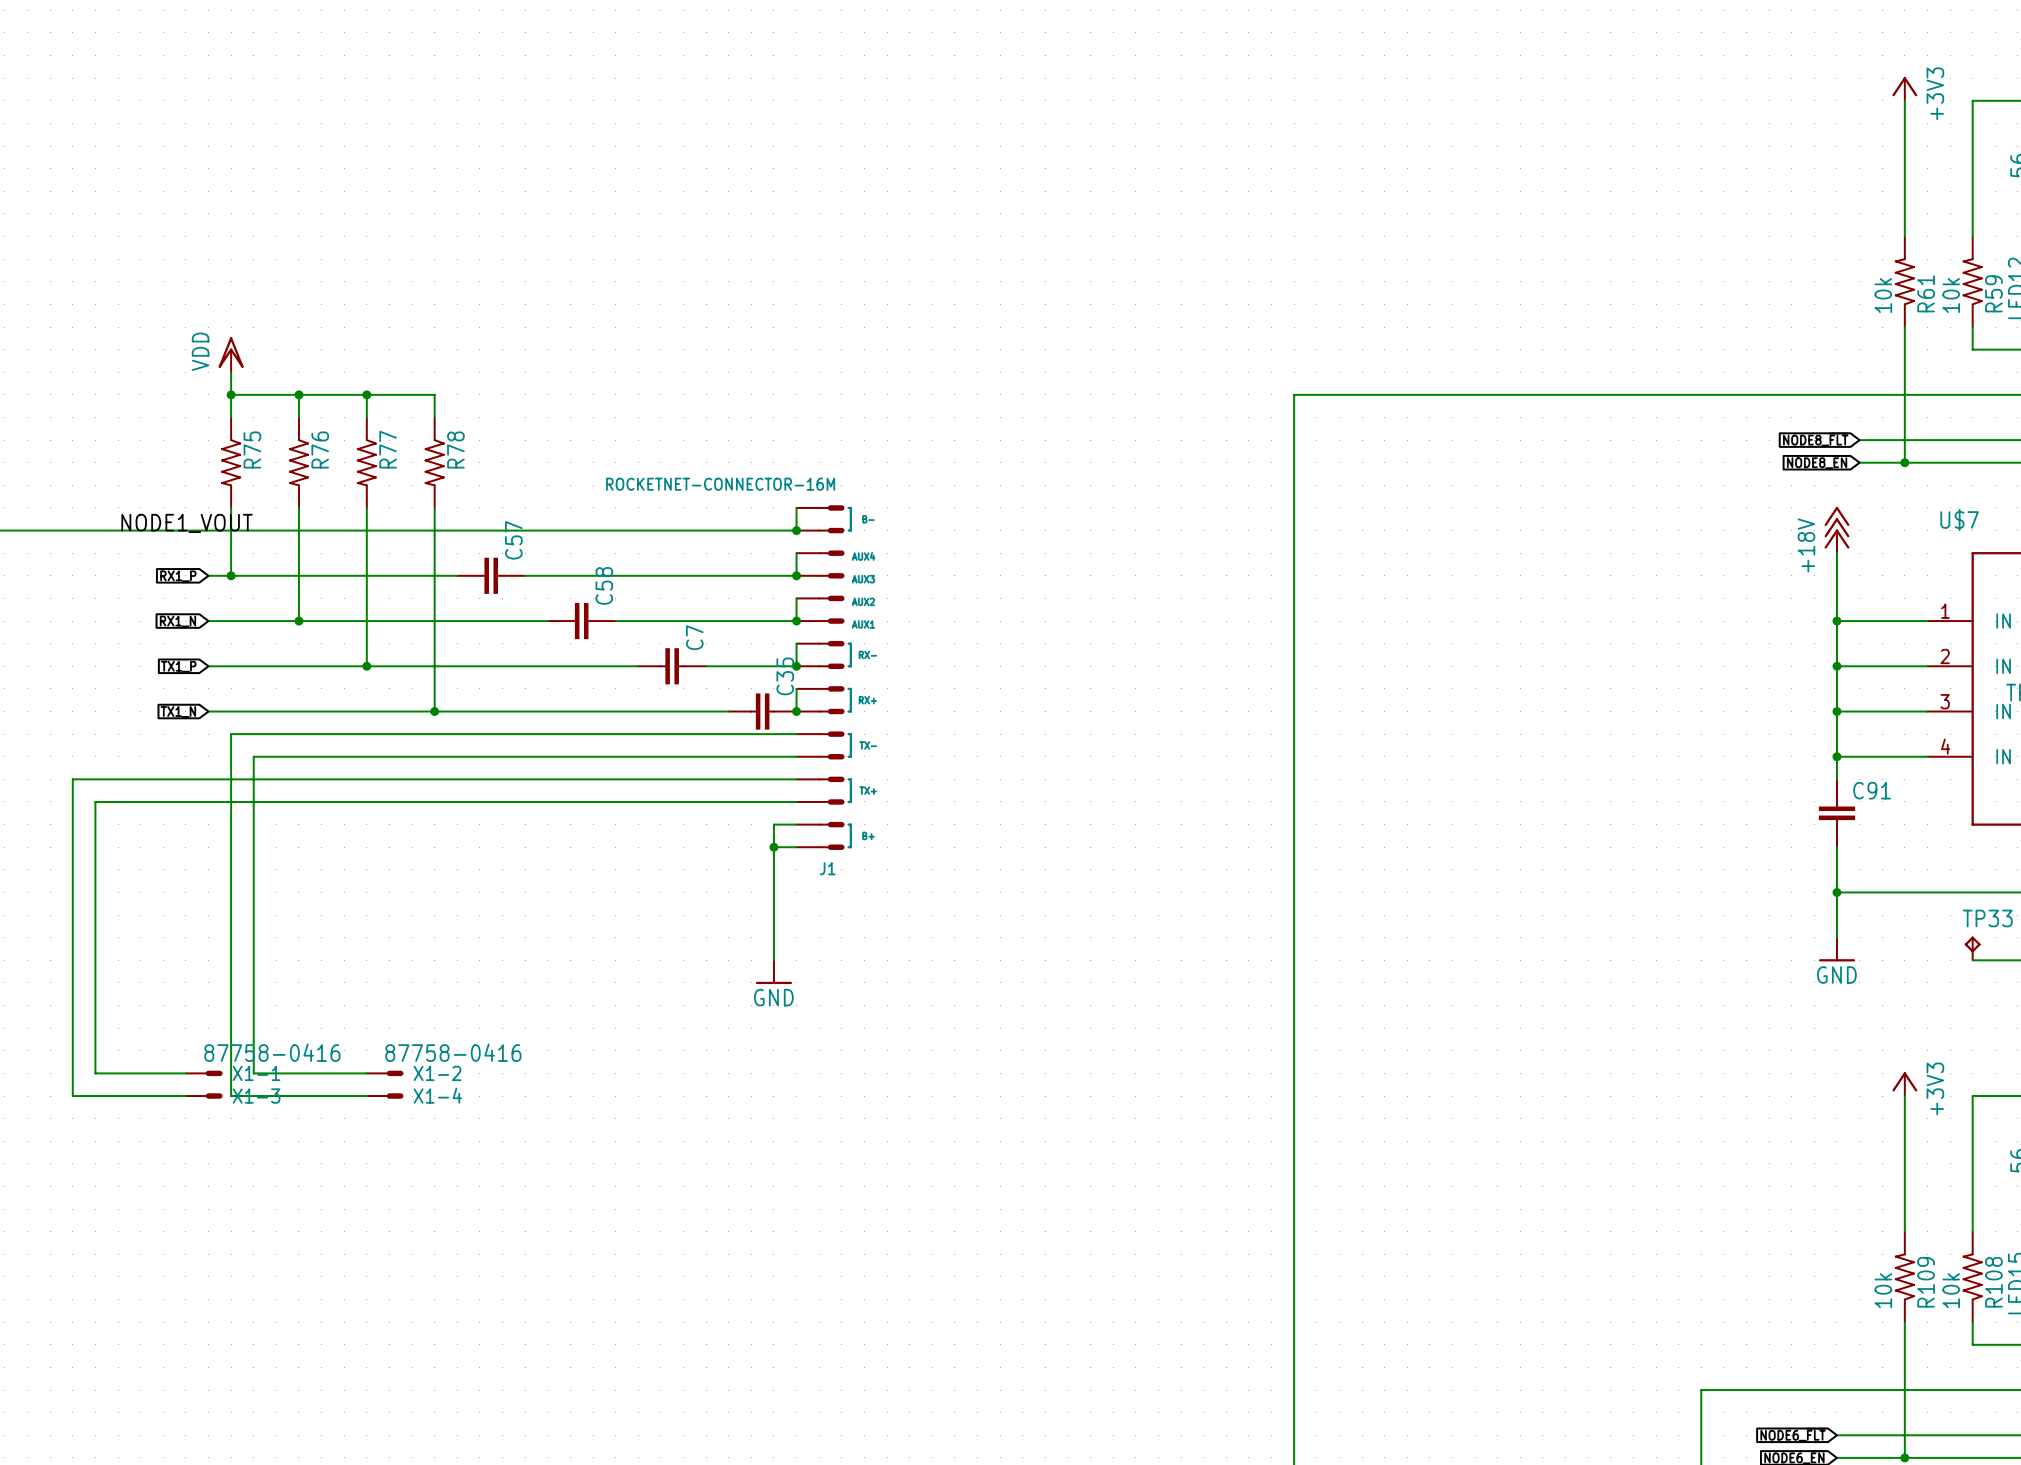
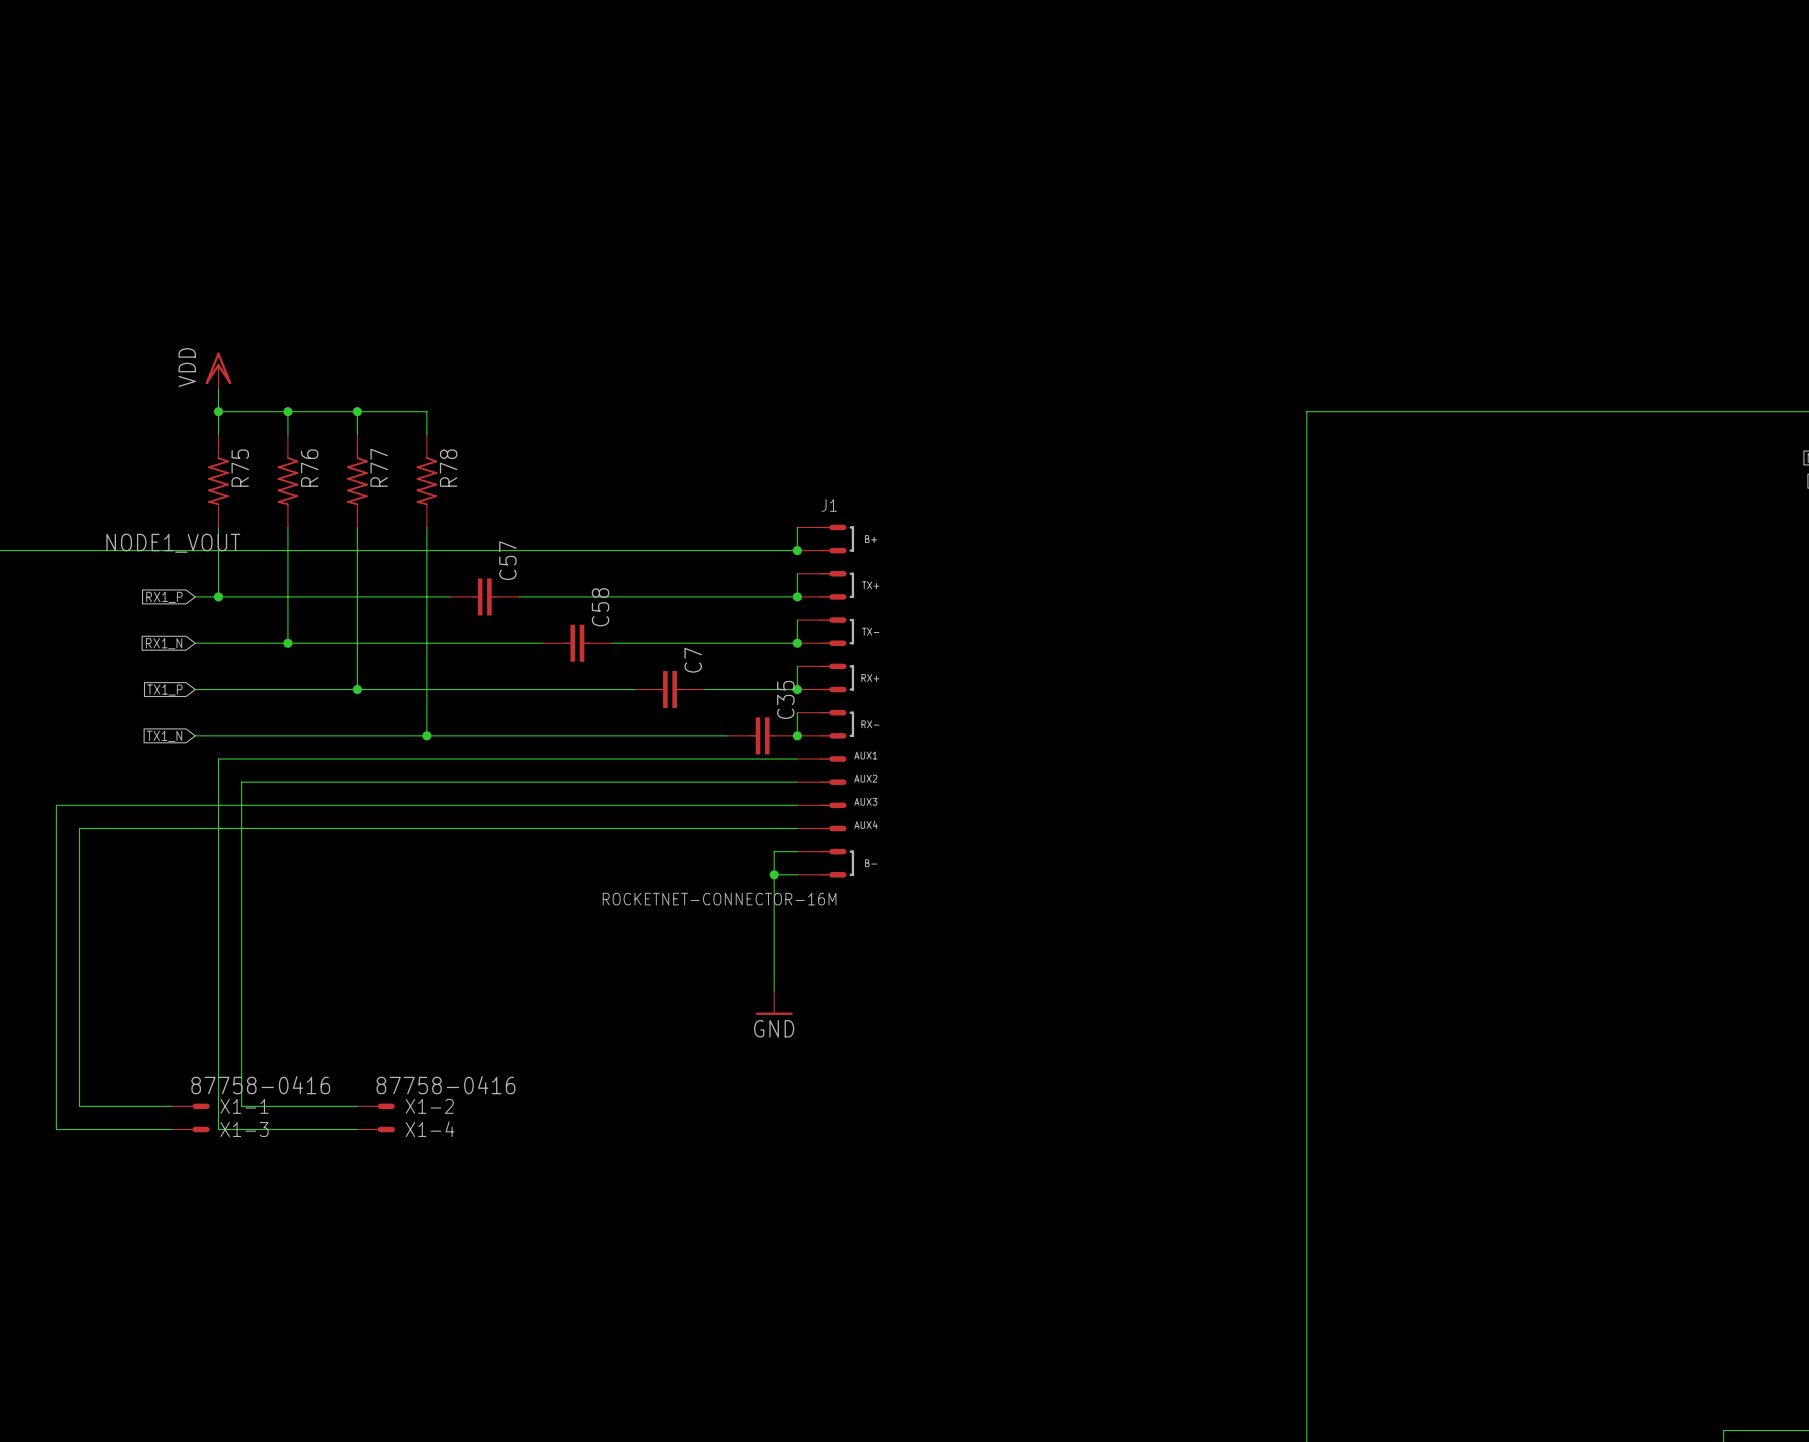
J1 value position: ROCKETNET-CONNECTOR-16M (720, 484) -> ROCKETNET-CONNECTOR-16M (719, 899)
J1 symbol: [796, 505, 852, 850] -> [797, 524, 855, 878]
J1 name position: J1 (827, 868) -> J1 (829, 505)

